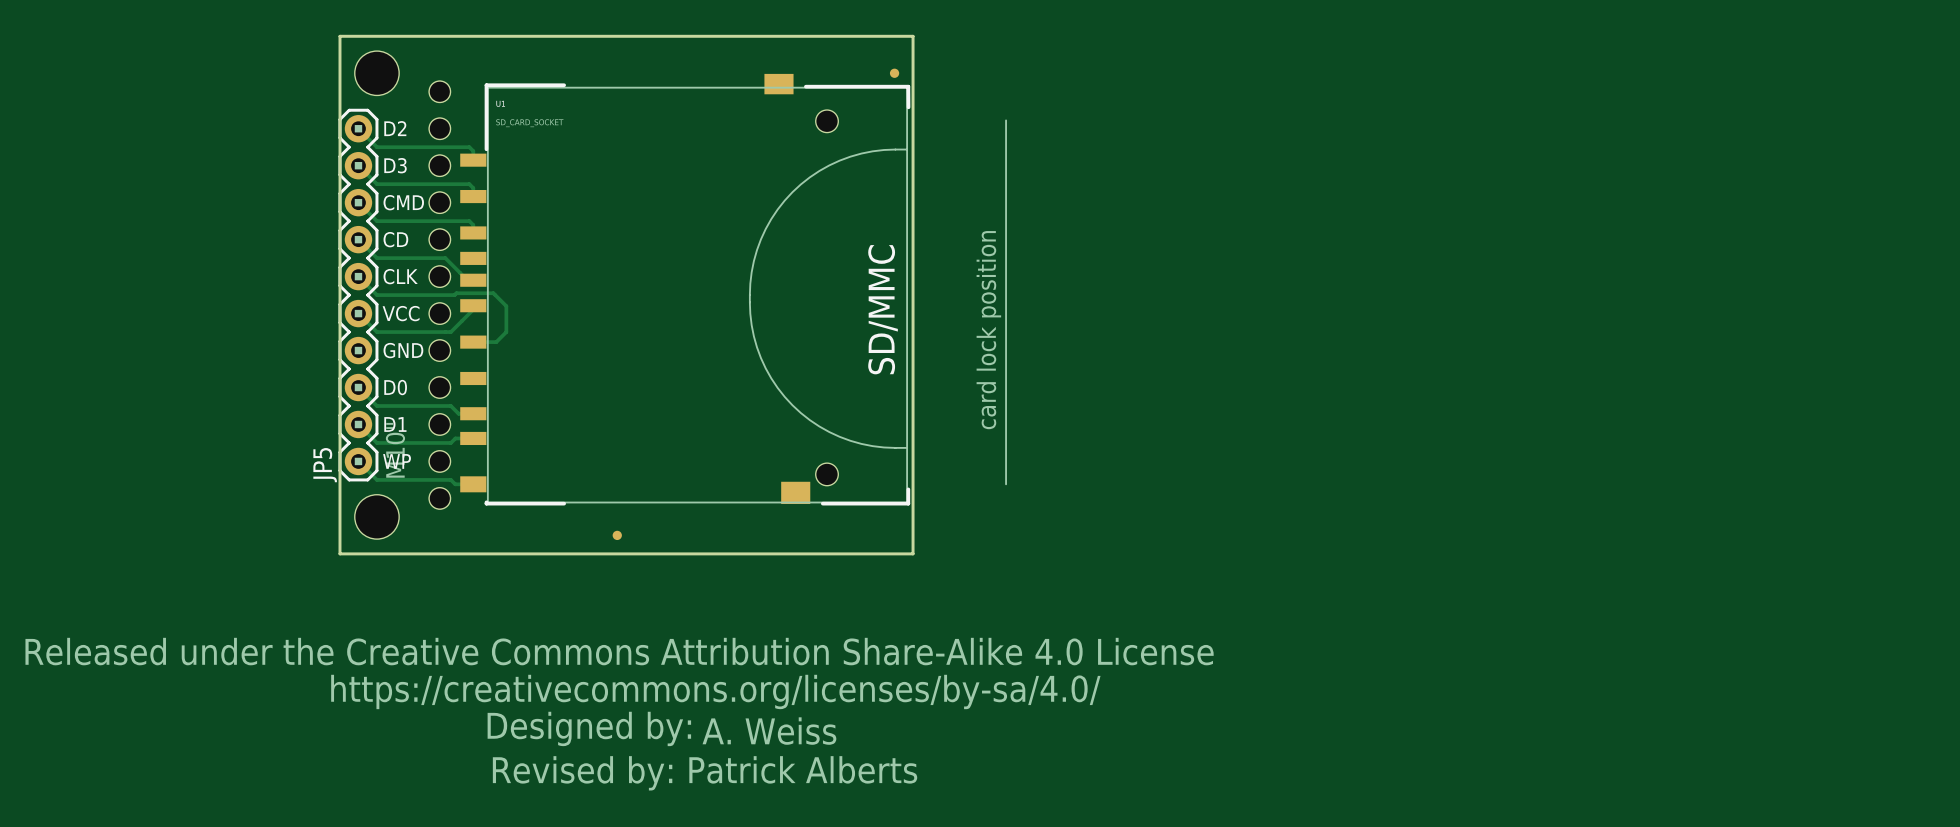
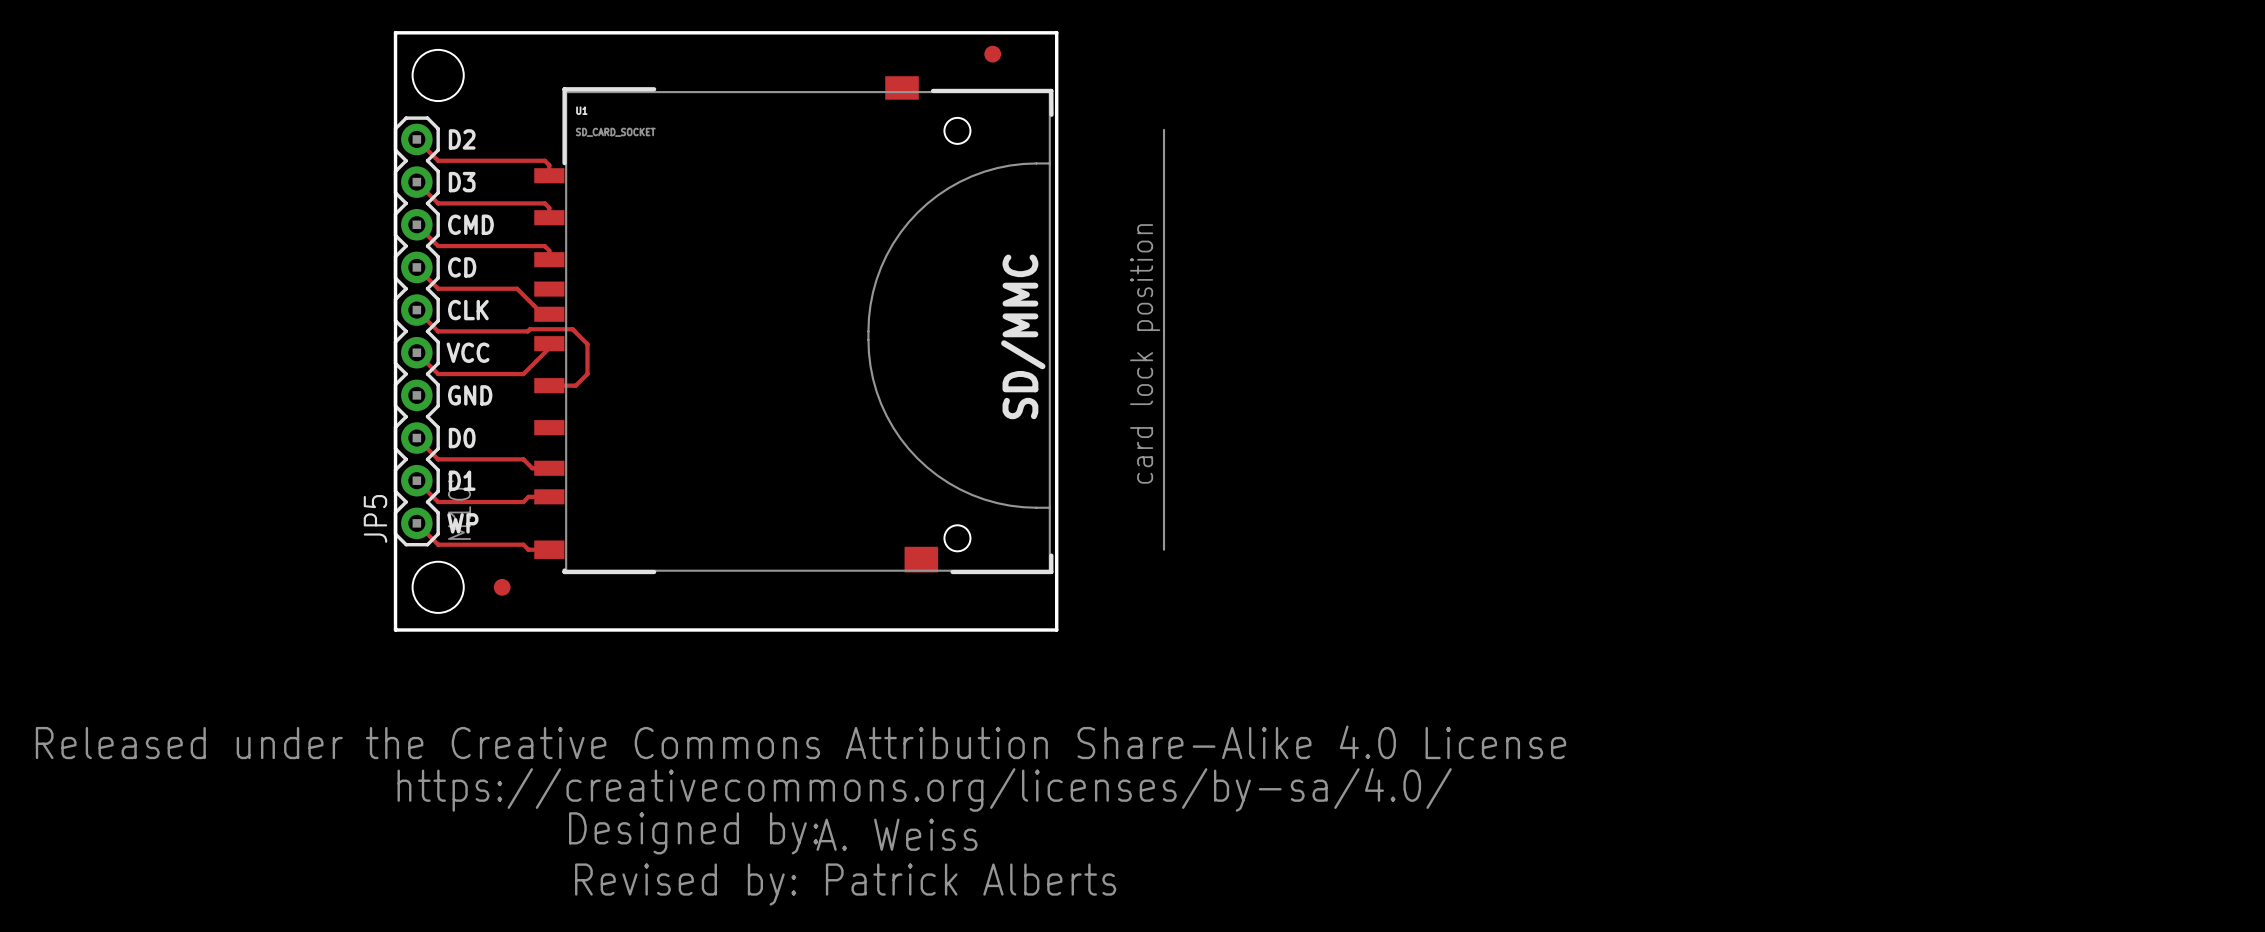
part: none -> (992, 54)
part: (894, 73) -> none
part: (439, 295) -> none
part: none -> (502, 587)
part: (617, 535) -> none

